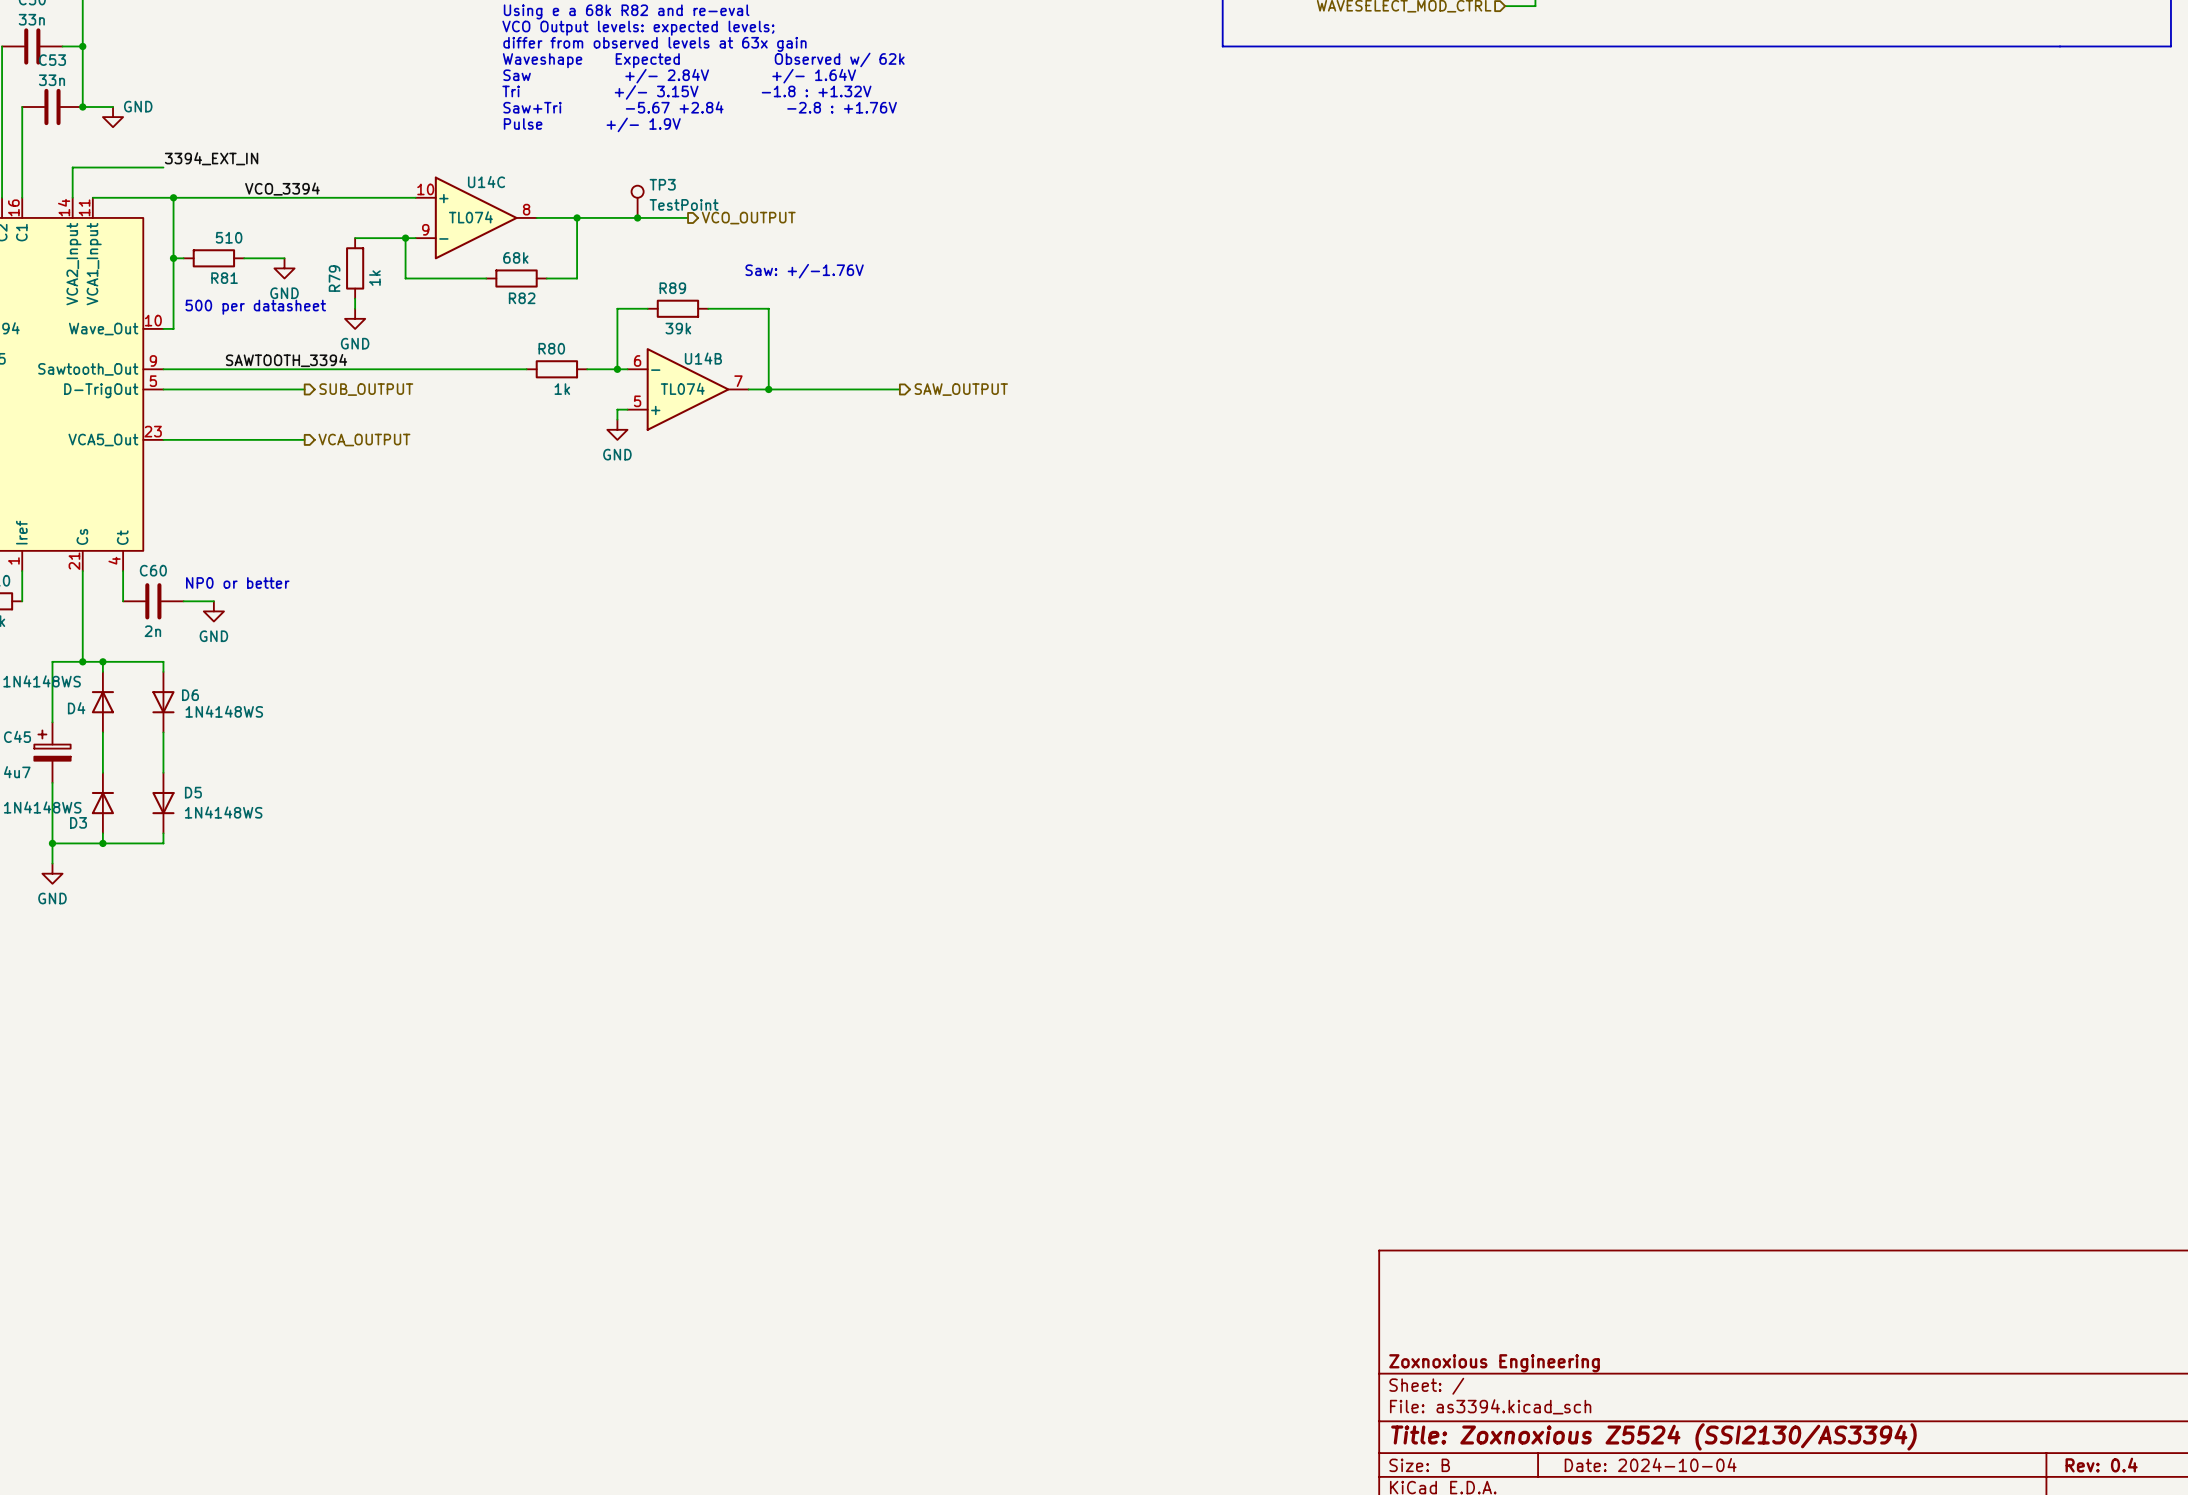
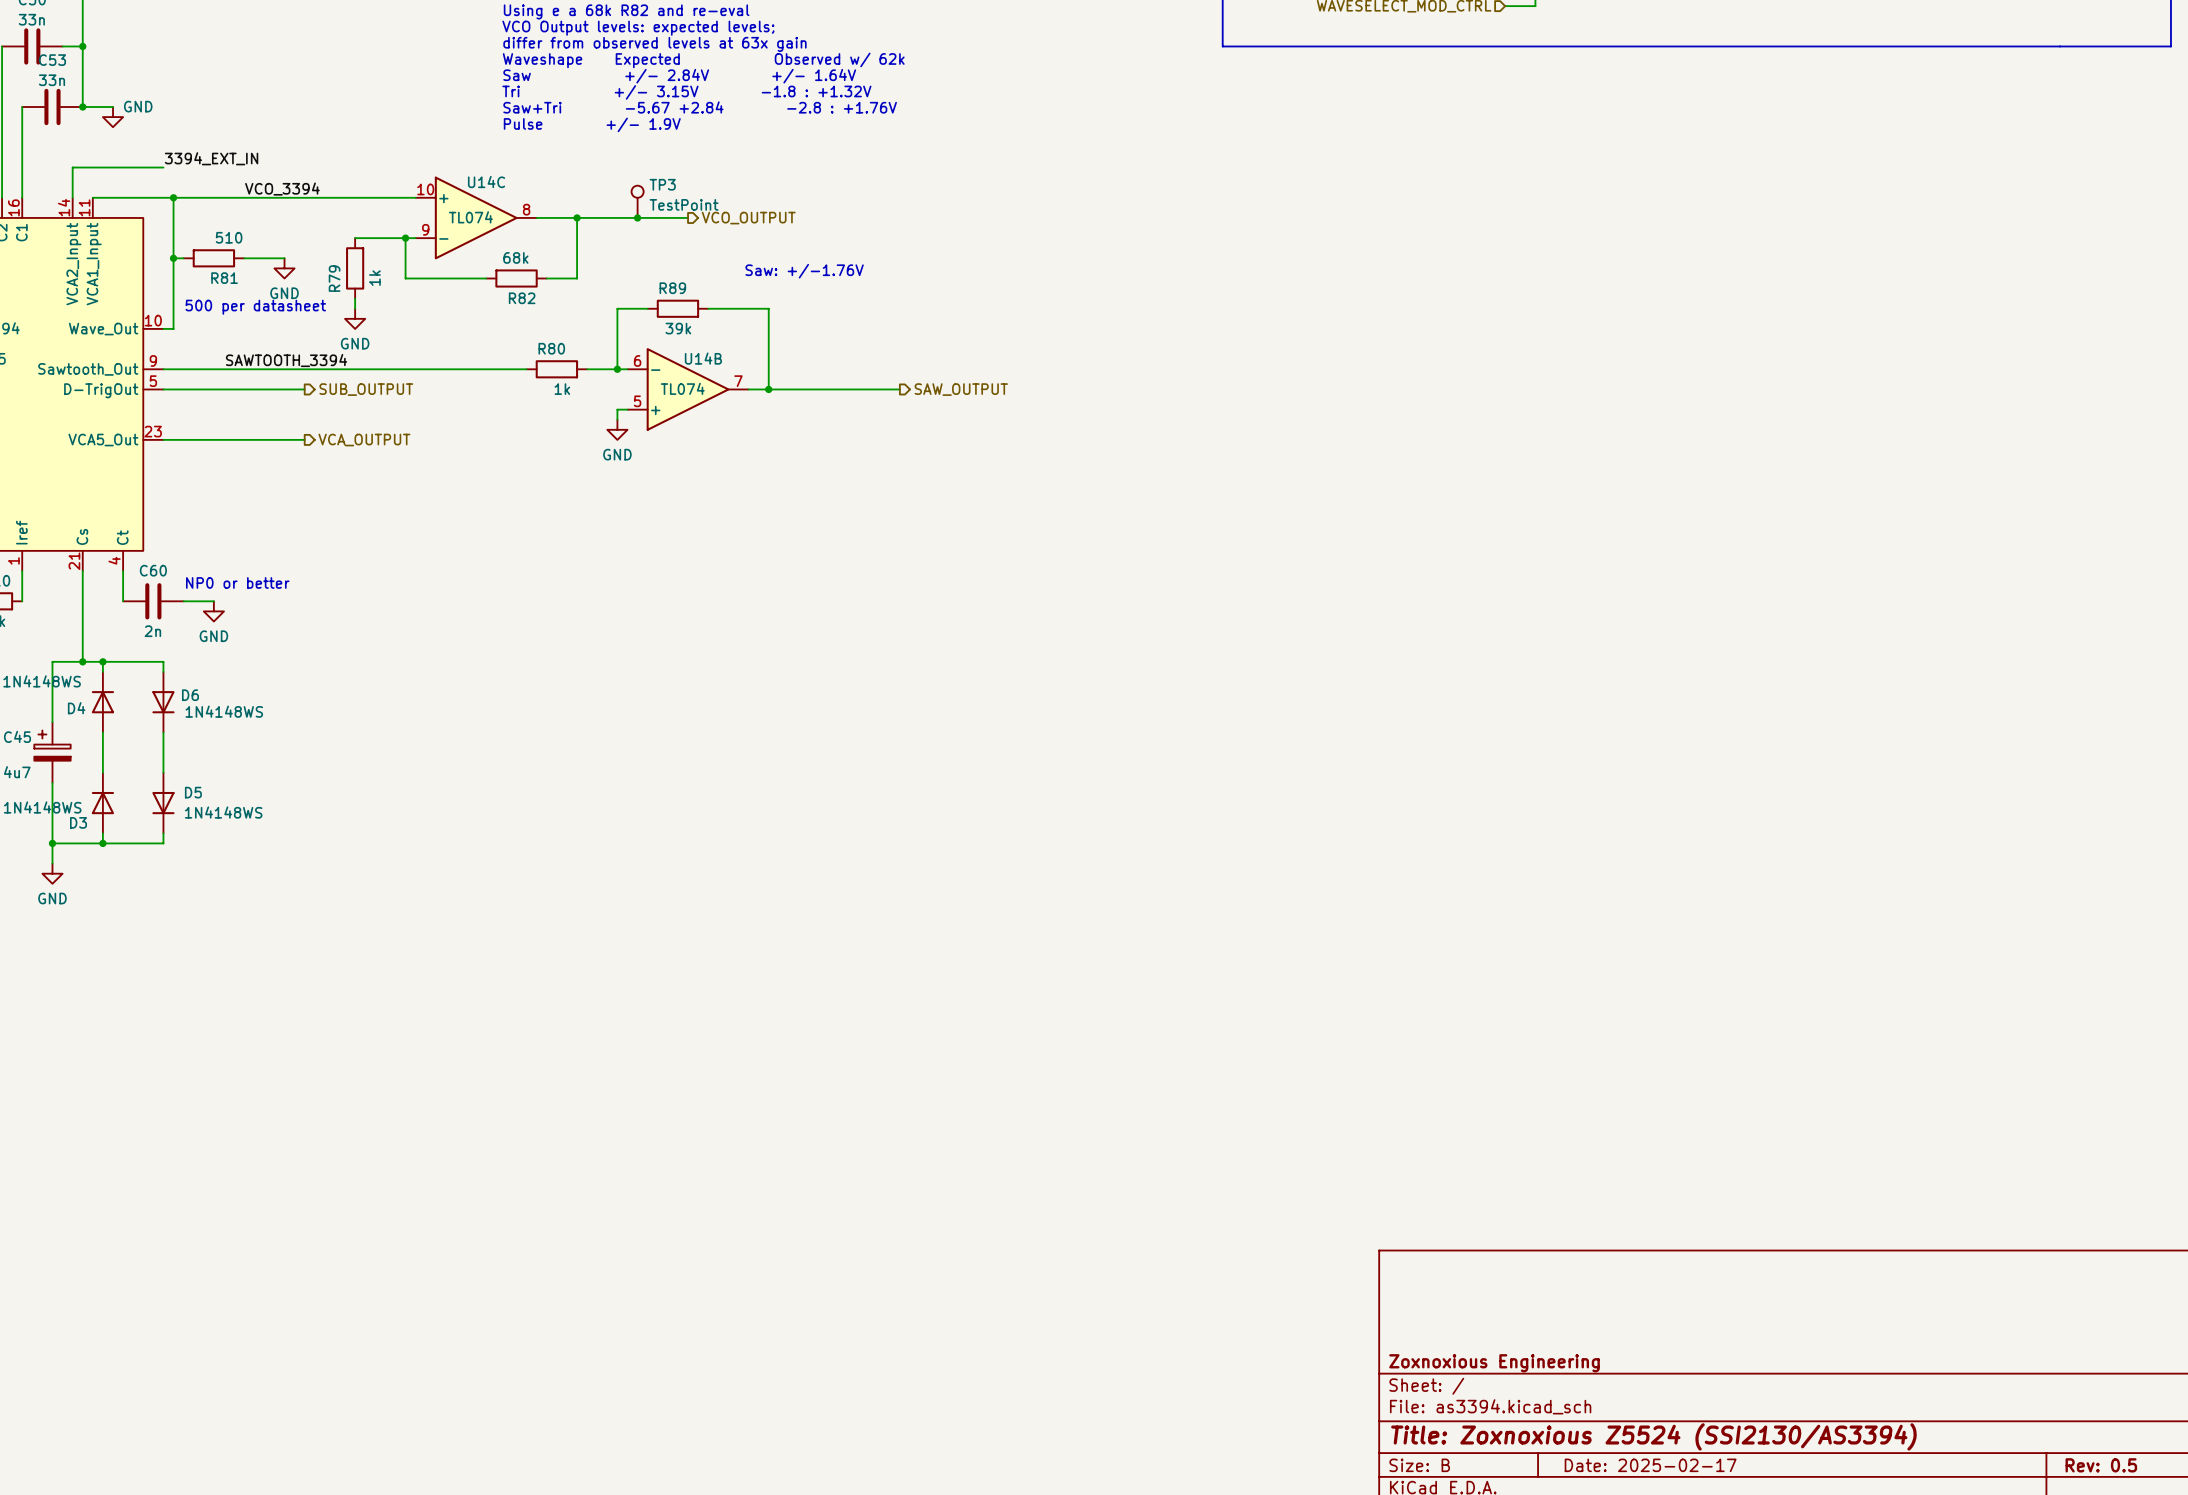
title block: Date: 2024-10-04 (1650, 1465) -> Date: 2025-02-17 (1650, 1465)
title block: Rev: 0.4 (2101, 1465) -> Rev: 0.5 (2101, 1465)

